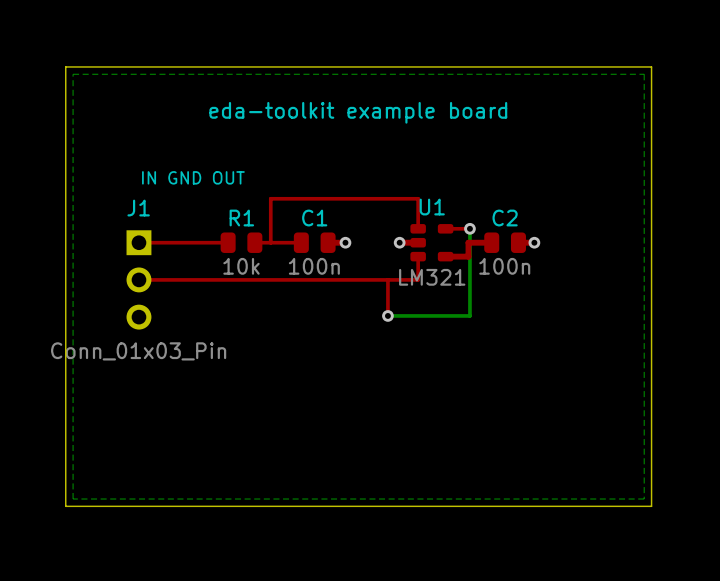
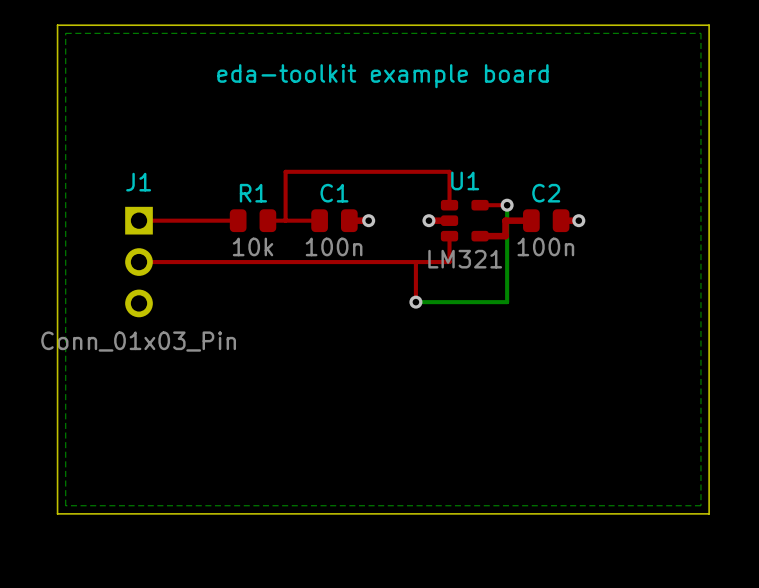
text: IN GND OUT (193, 177) -> none

